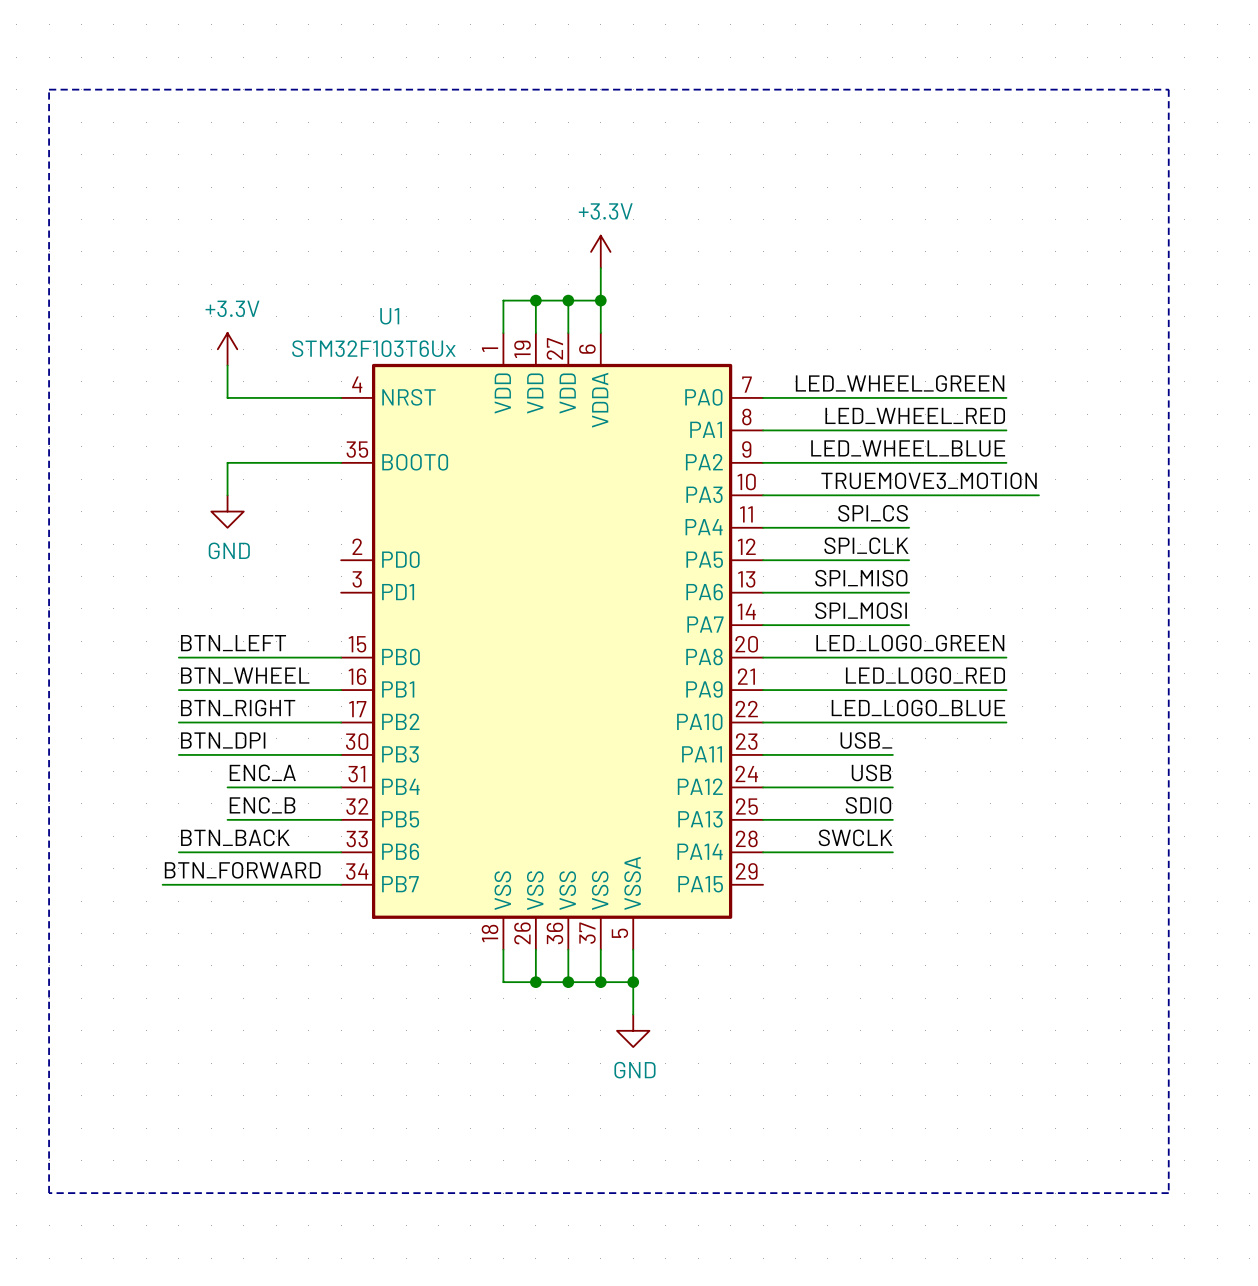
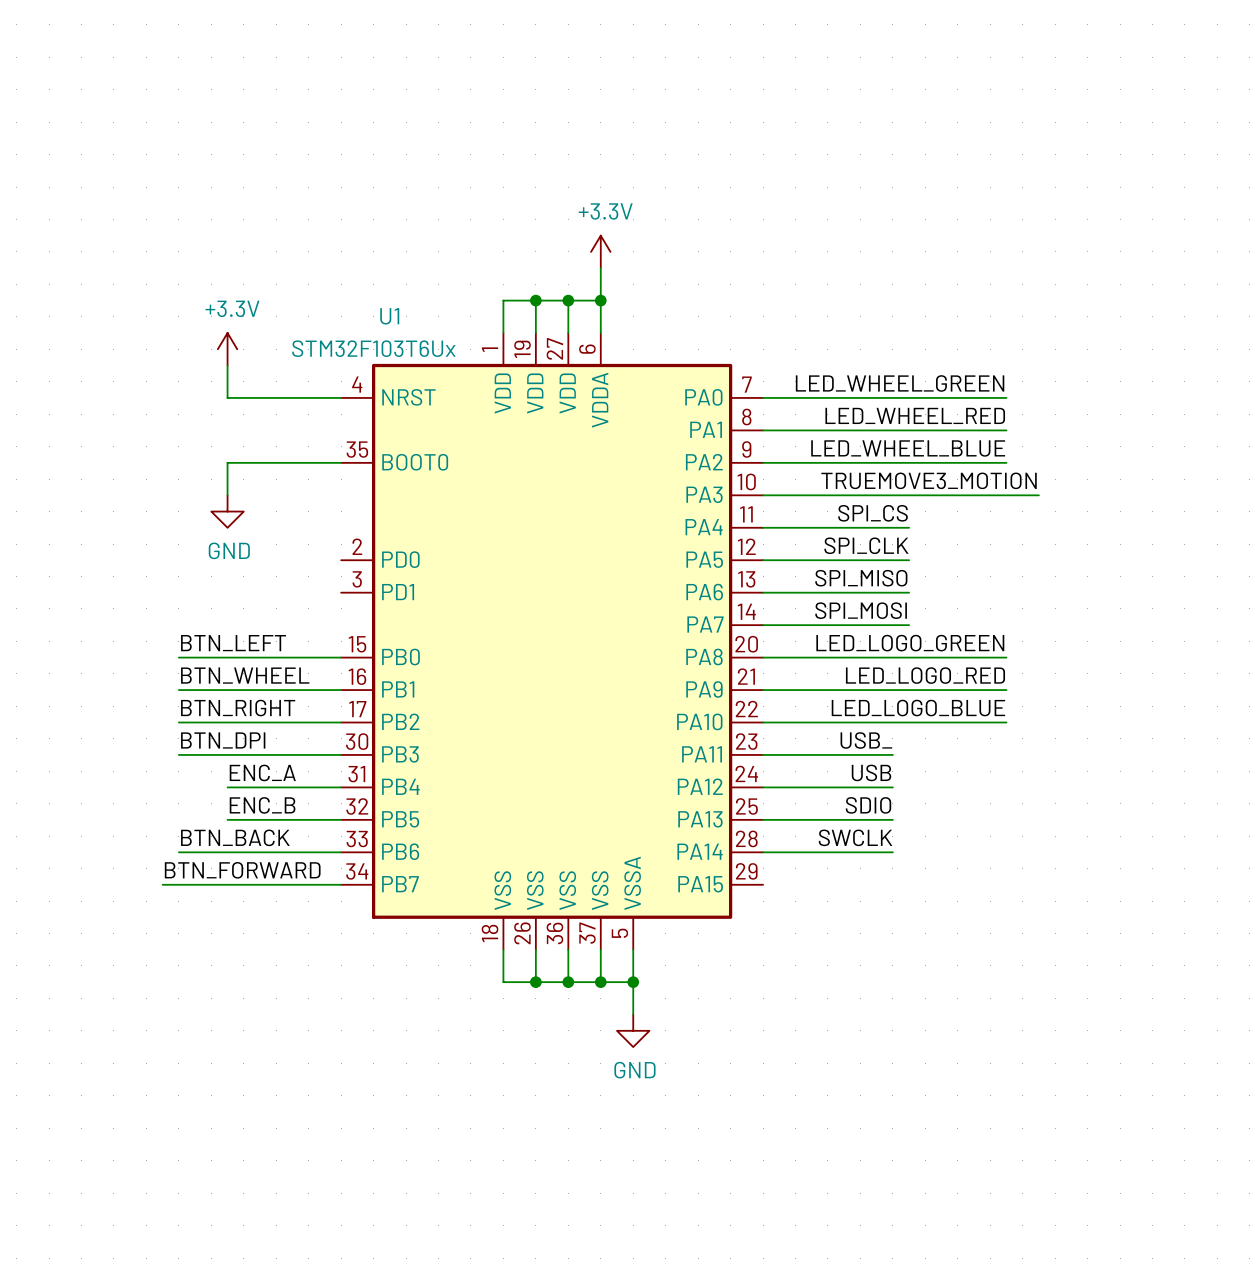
line: (49, 89) (1168, 89) (1168, 1193) (49, 1193) (49, 89) -> none

